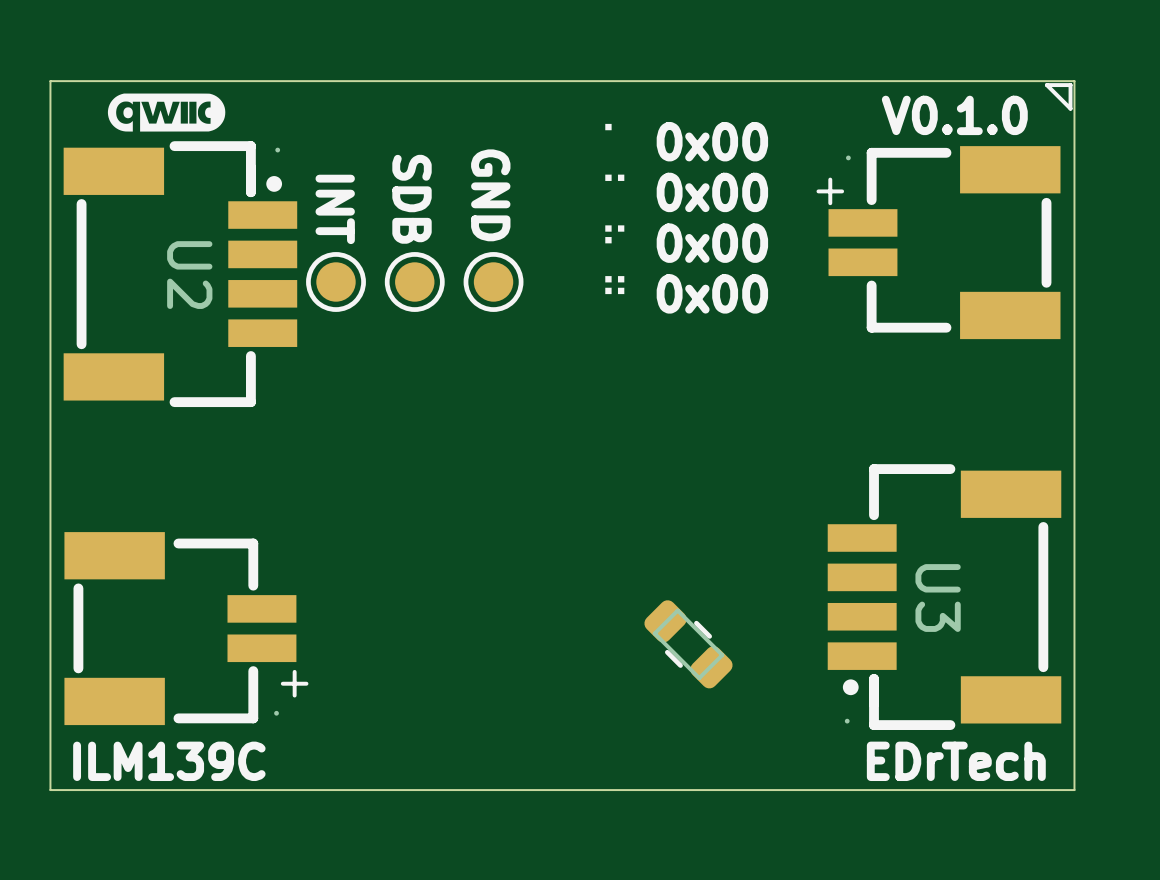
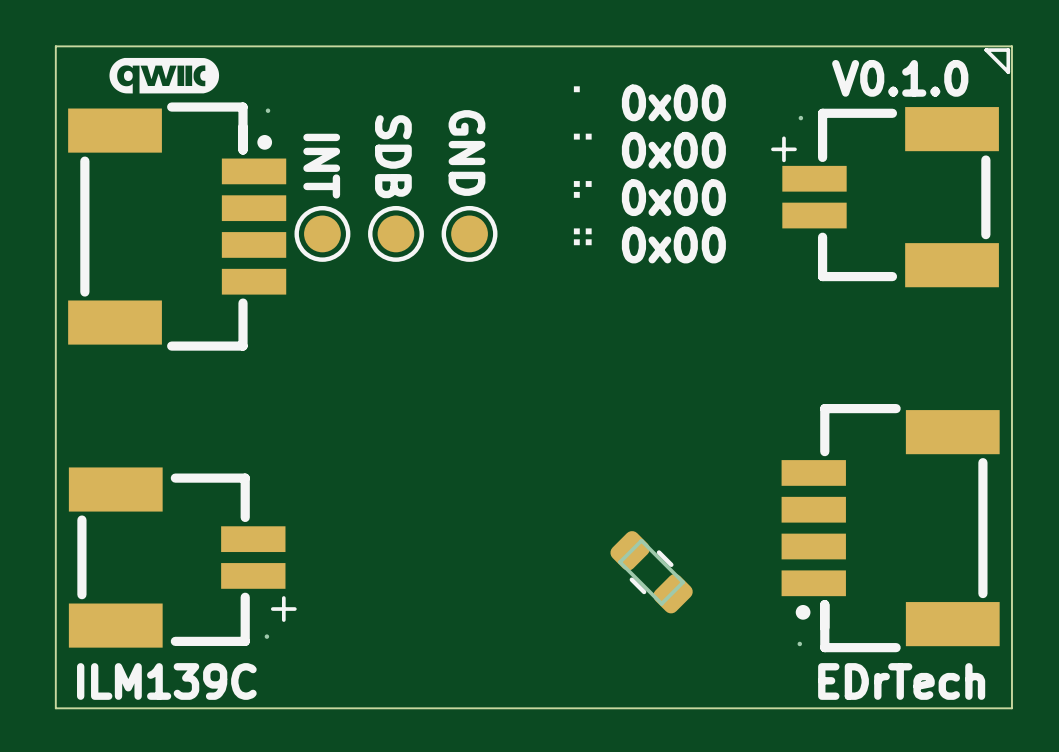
U2 name: U2 (189, 275) -> none
U3 name: U3 (938, 598) -> none

